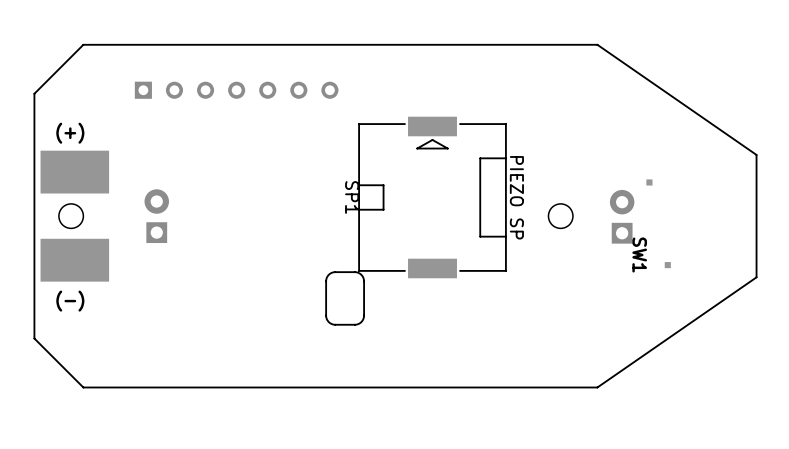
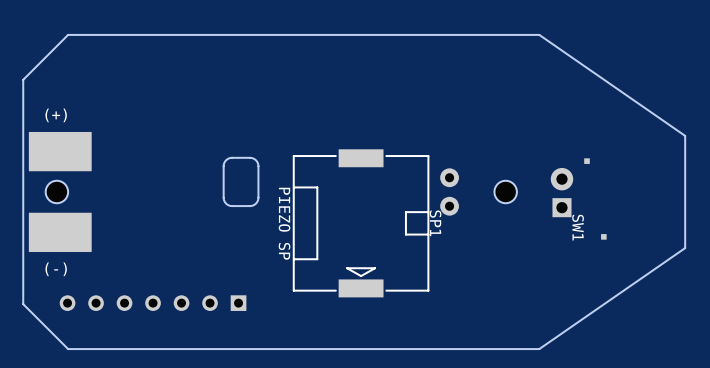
part rotation: 0° (236, 90) -> 180° (153, 303)
part position: (236, 90) -> (153, 303)
SP1 rotation: 0° (432, 197) -> 180° (361, 223)
part: (156, 216) -> none
part: none -> (449, 191)
part position: (345, 298) -> (241, 181)

